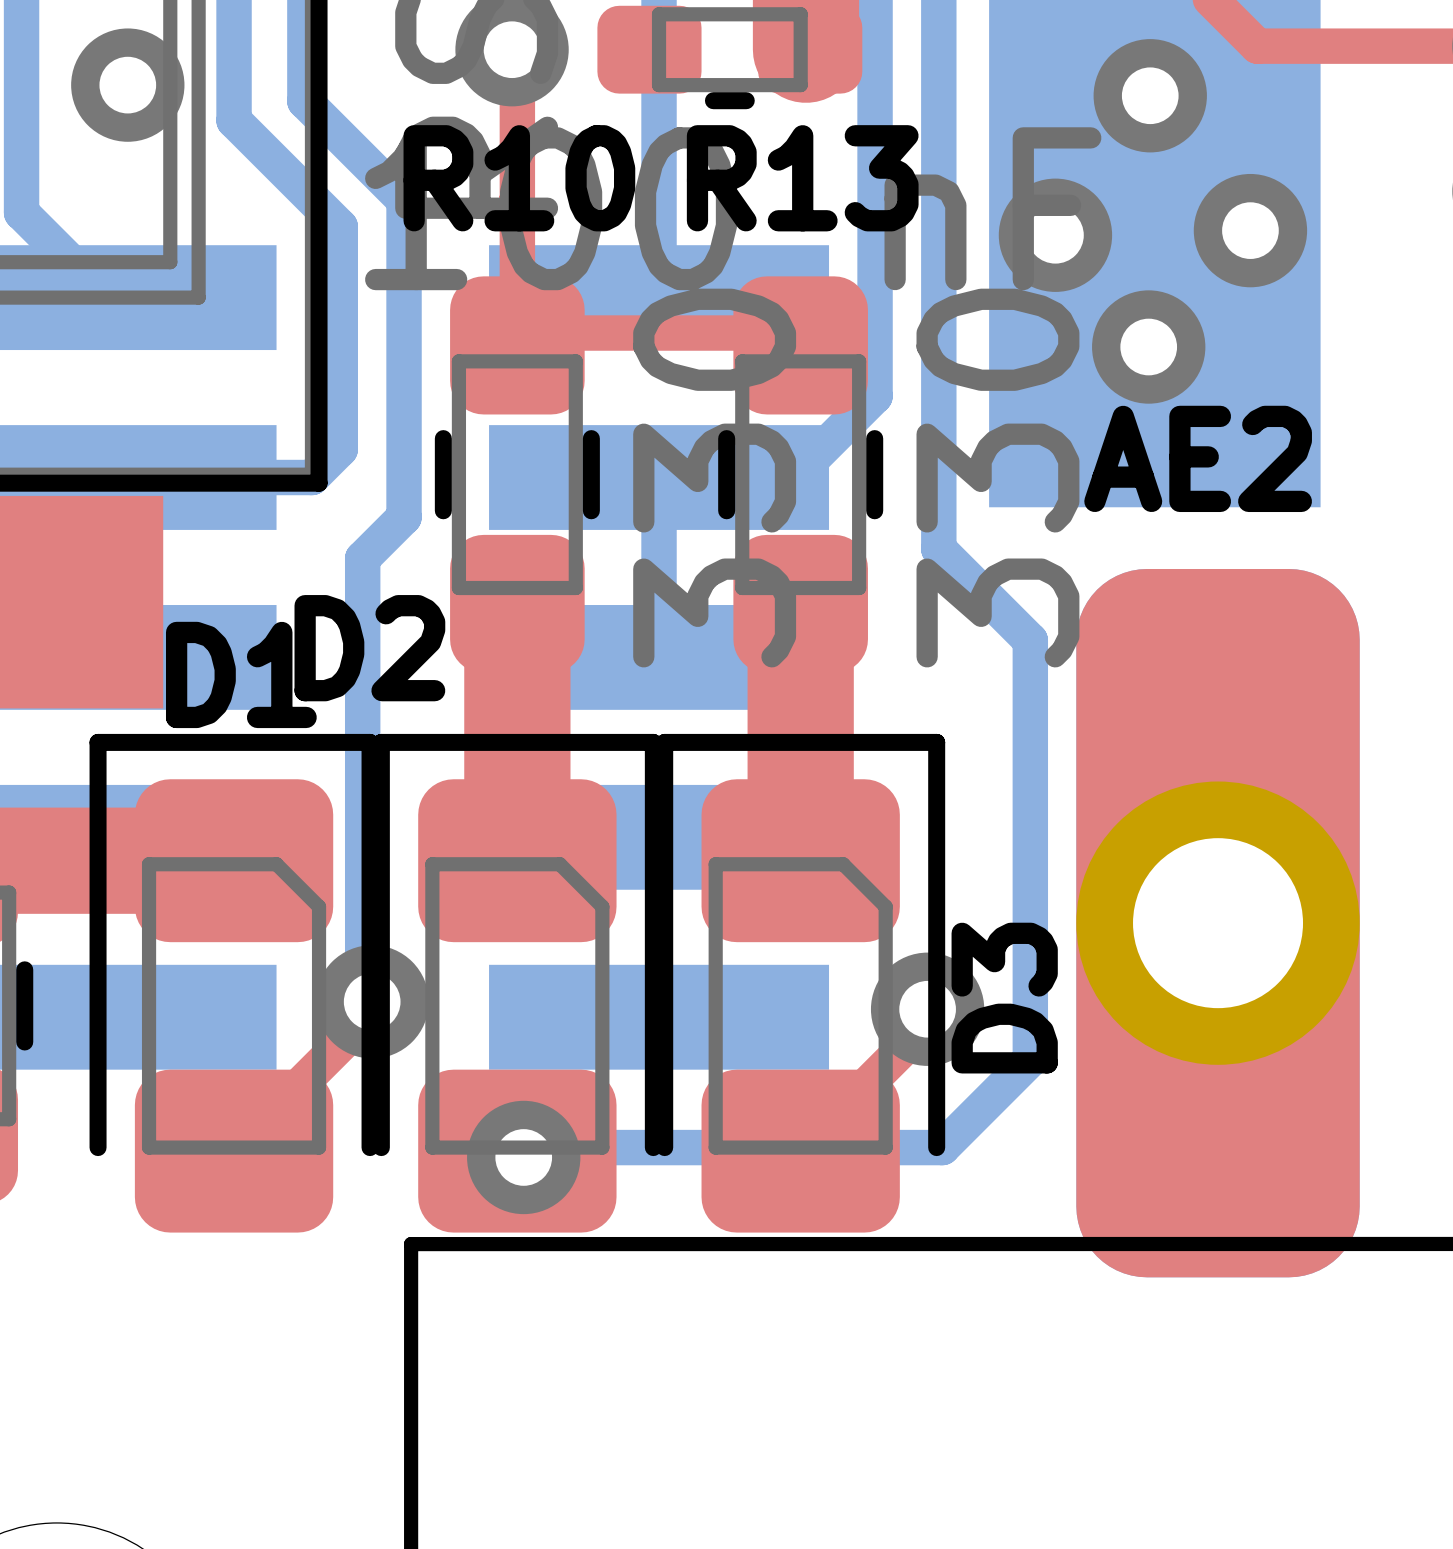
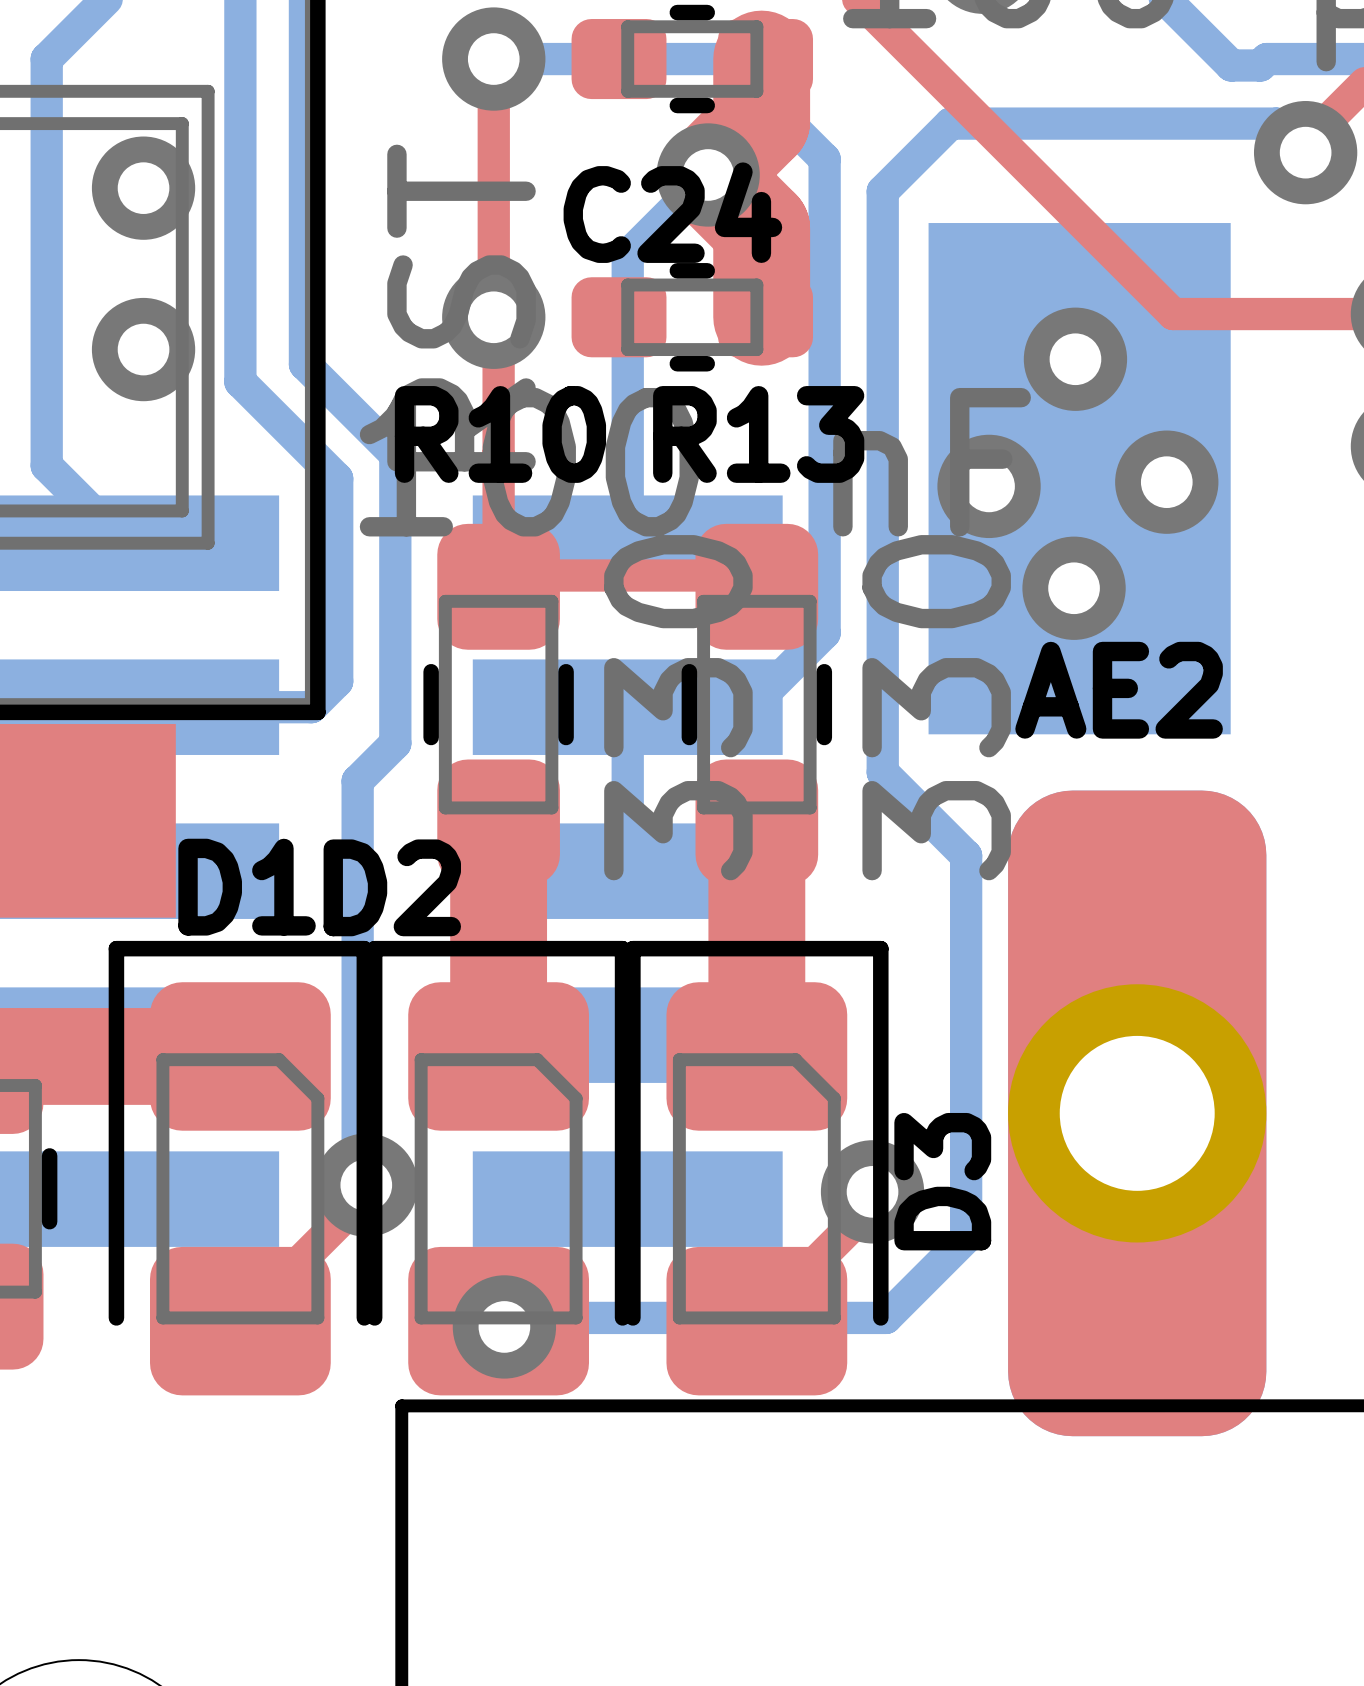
D2 name position: D2 (369, 648) -> D2 (392, 887)

